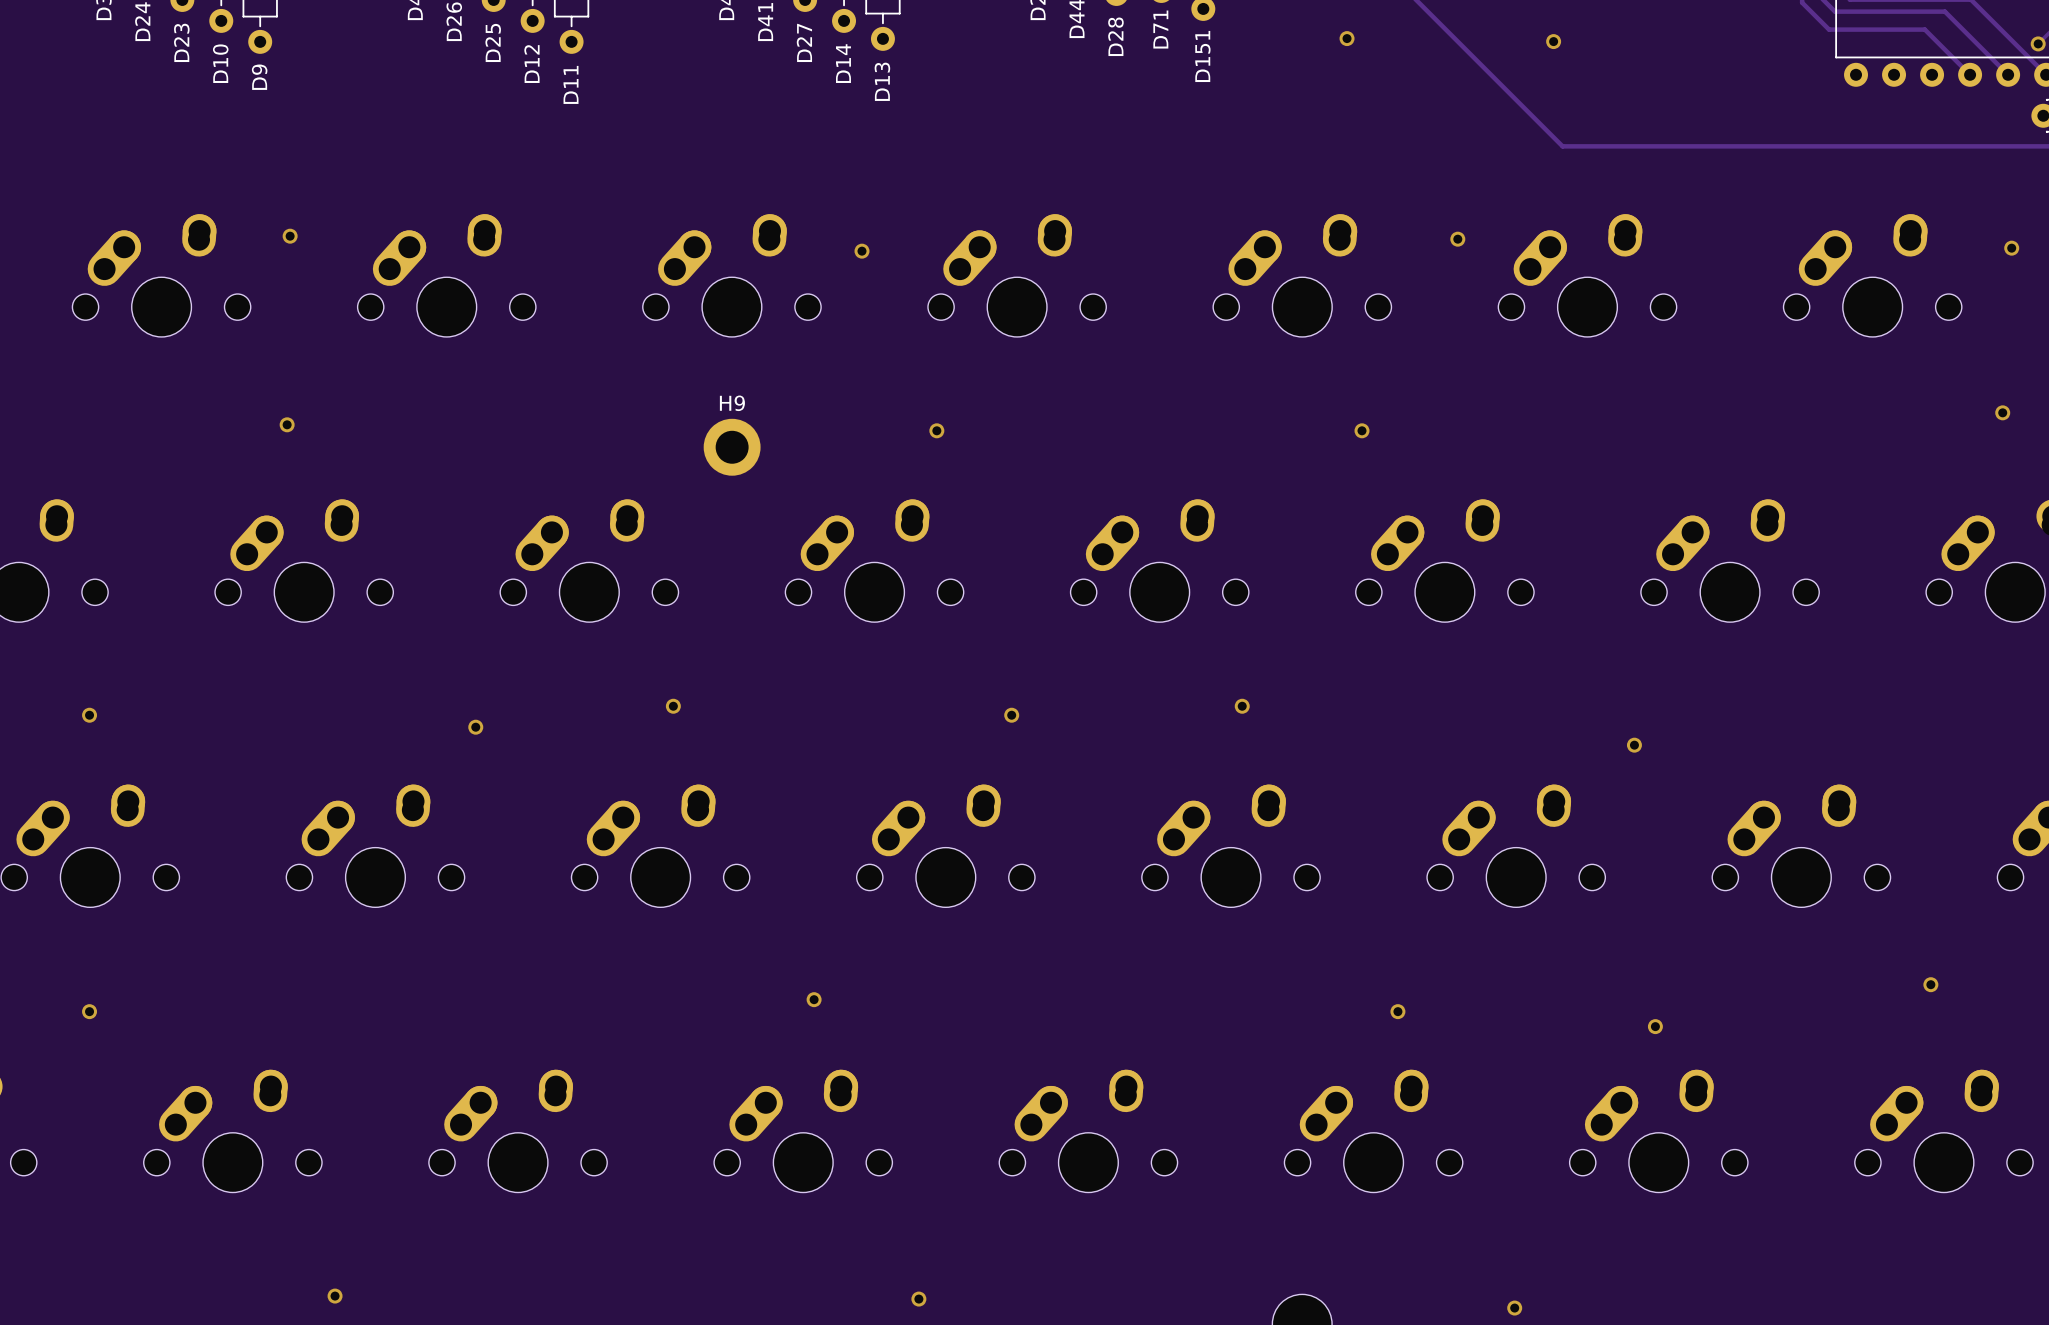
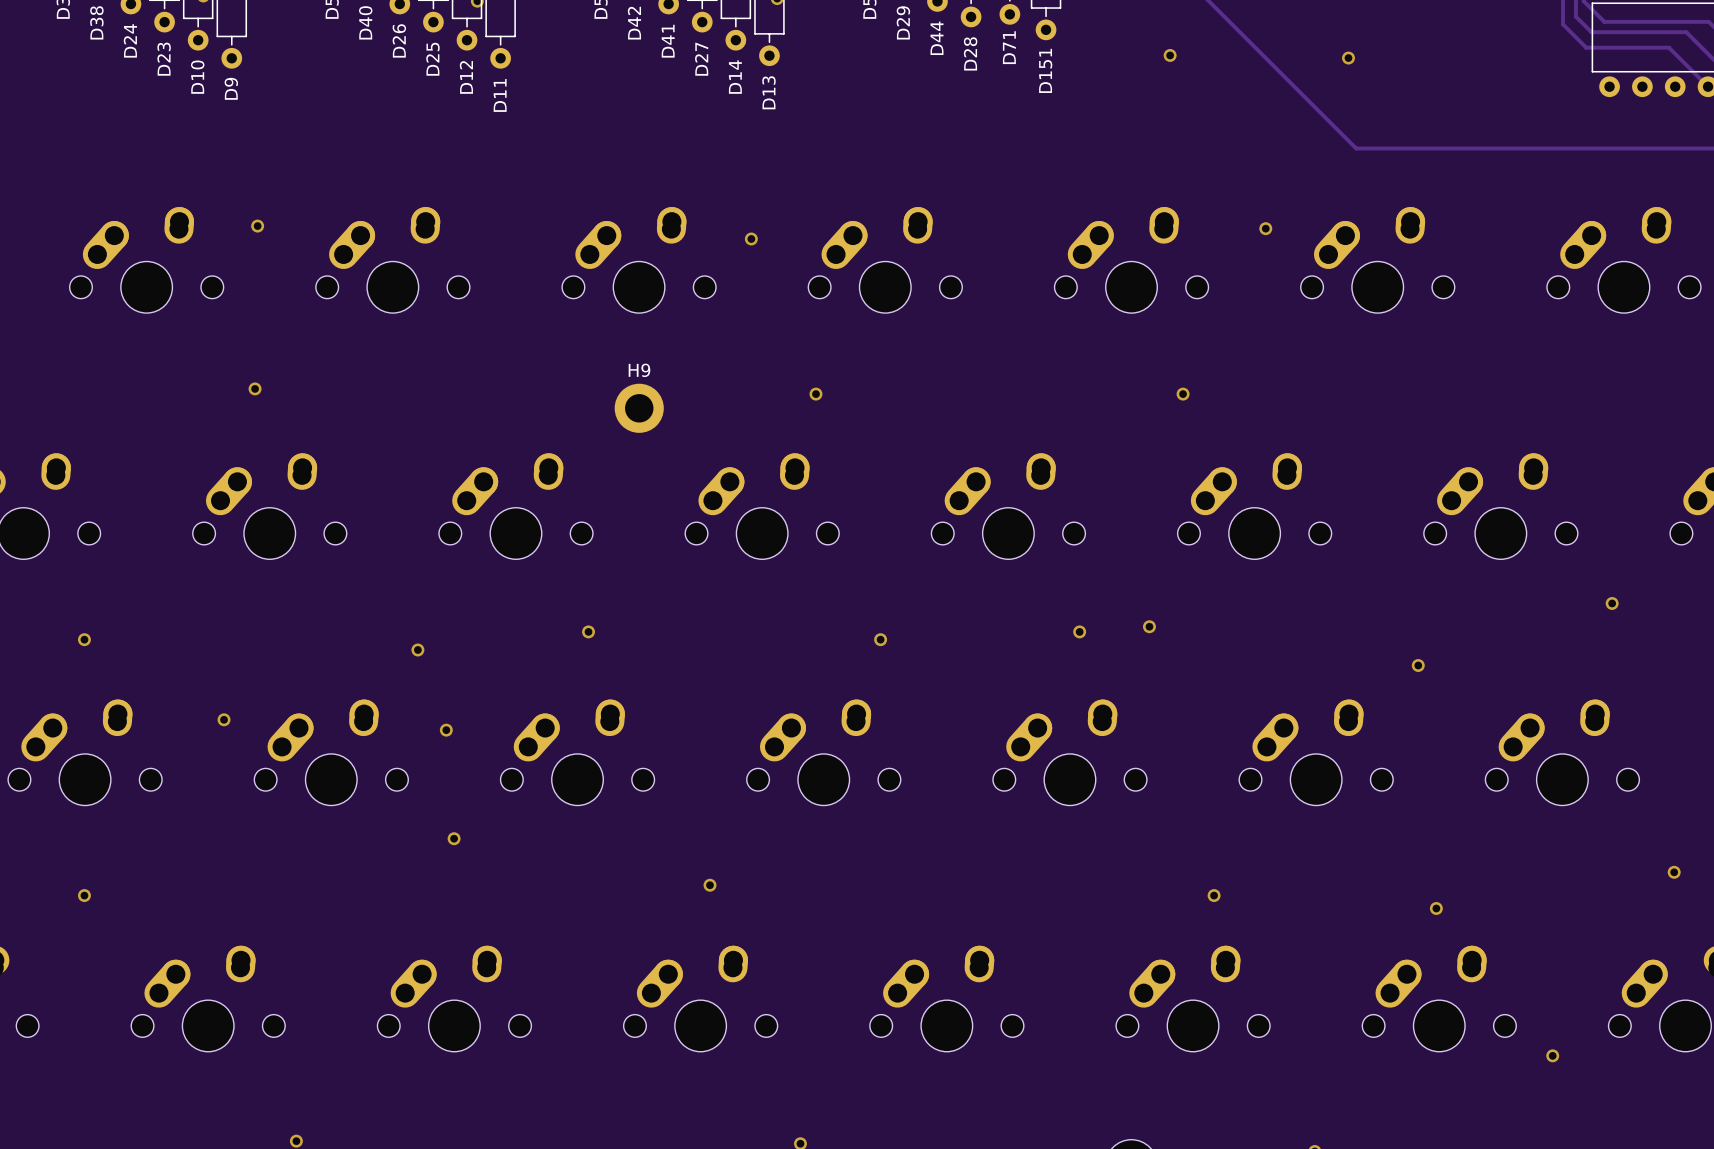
via: none -> (1612, 603)
via: none -> (1149, 626)
via: none -> (224, 719)
via: none -> (446, 730)
via: none -> (454, 838)
via: none -> (1552, 1055)

